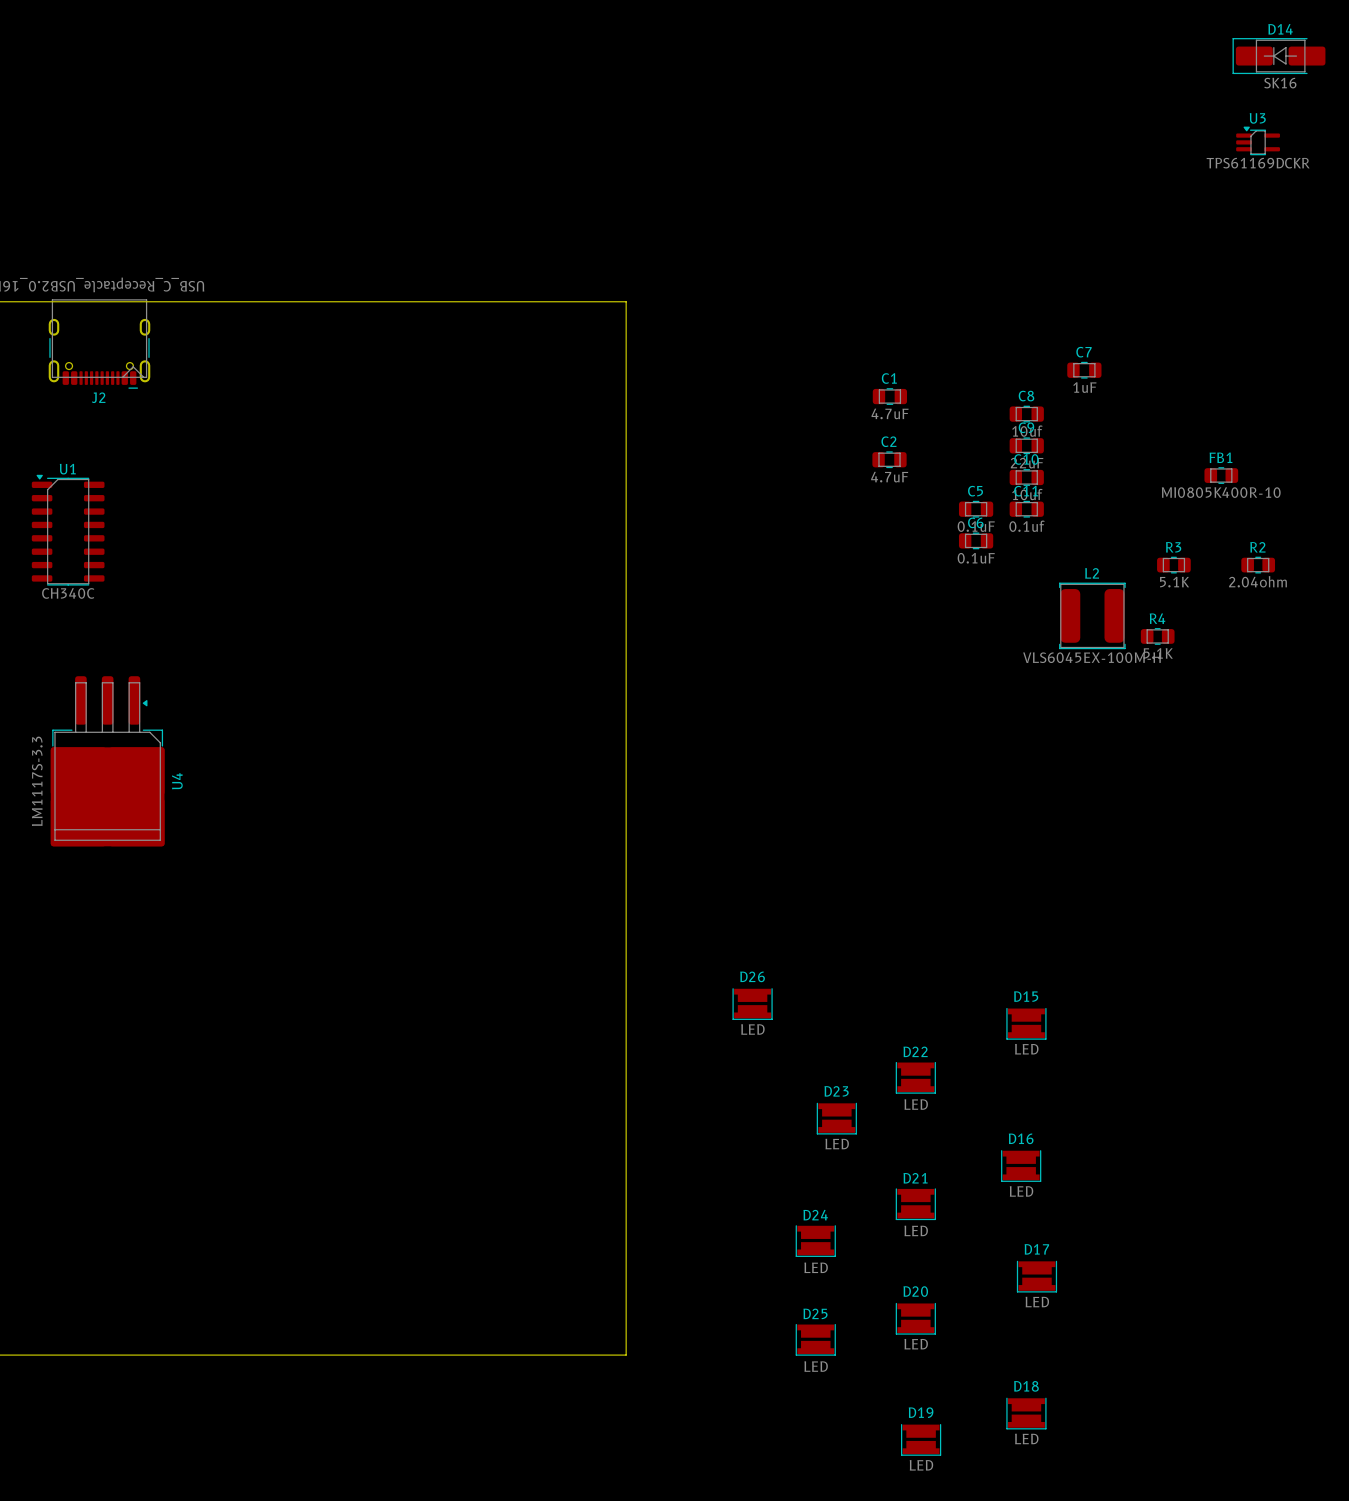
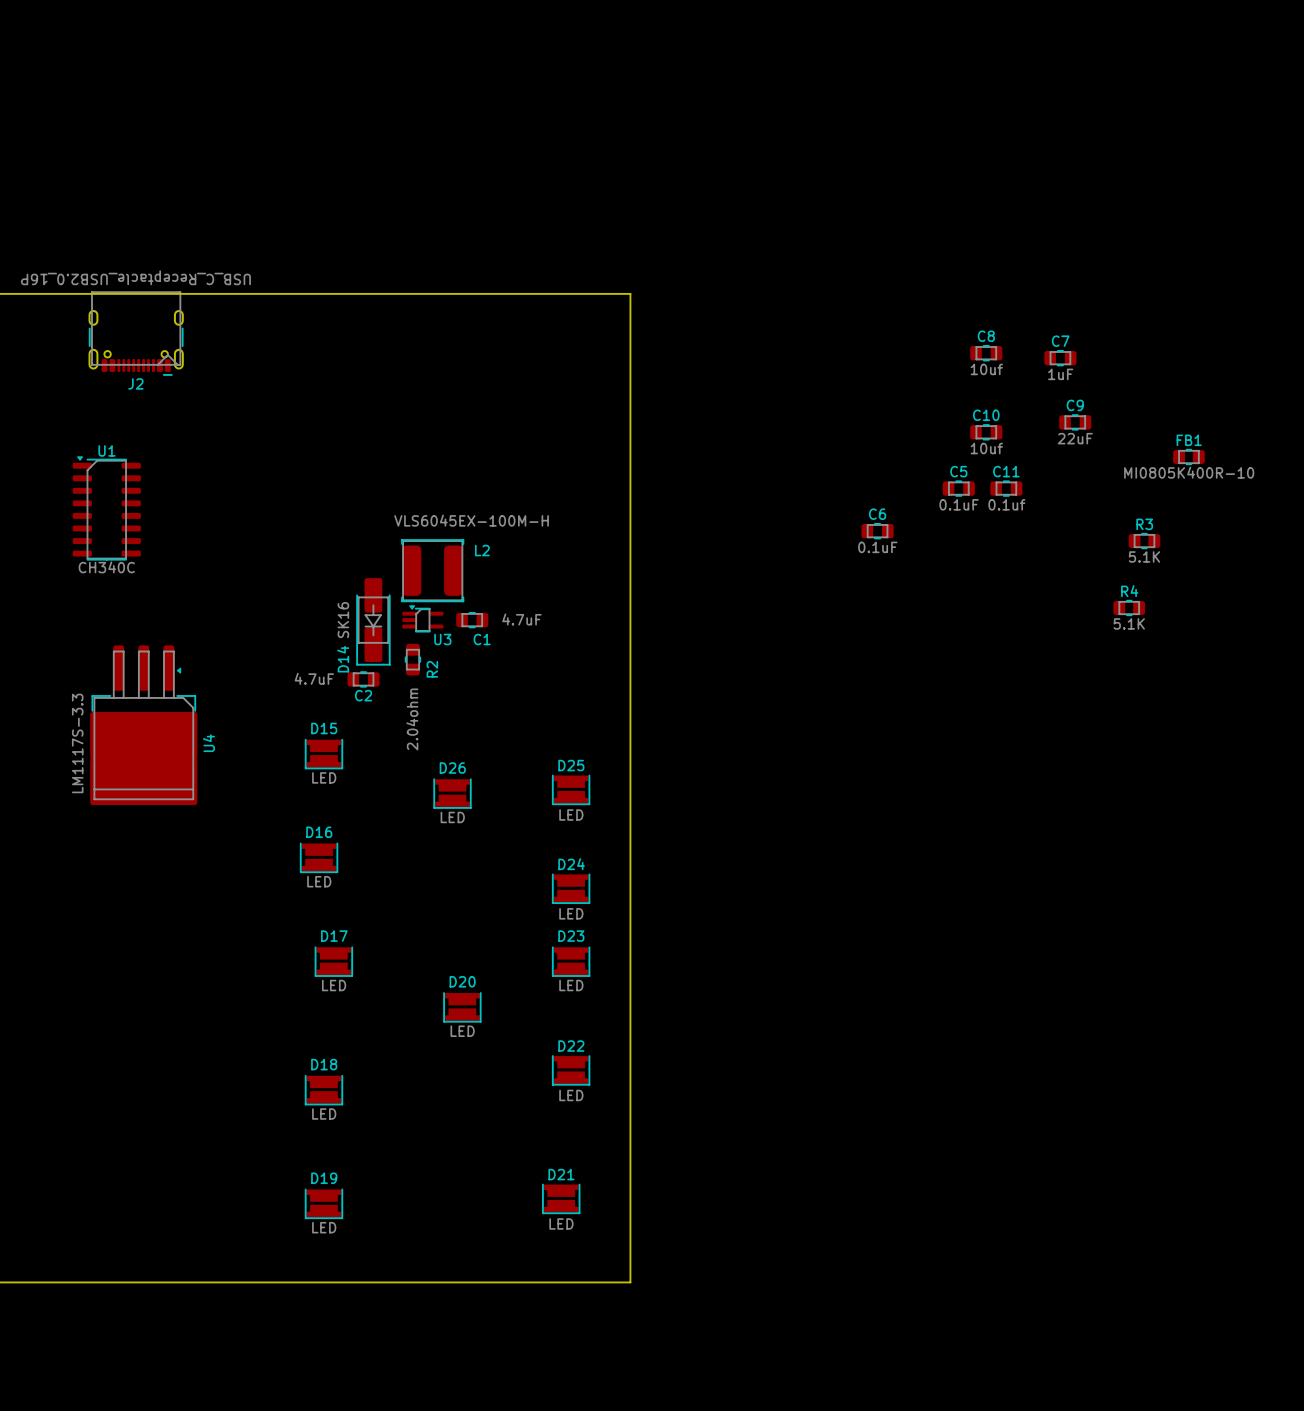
D14 name position: D14 (1280, 29) -> D14 (343, 659)
D14 rotation: 0° (1278, 56) -> 90° counterclockwise (373, 621)
D14 position: (1278, 56) -> (373, 621)
D14 value position: SK16 (1280, 83) -> SK16 (343, 620)
U3 name position: U3 (1257, 118) -> U3 (442, 639)
U3 position: (1258, 140) -> (422, 618)
U3 value: TPS61169DCKR (1258, 163) -> none
C1 name position: C1 (889, 378) -> C1 (482, 639)
C1 position: (889, 396) -> (472, 620)
C1 value position: 4.7uF (890, 413) -> 4.7uF (521, 619)
C8 position: (1026, 414) -> (986, 353)
C2 name position: C2 (888, 441) -> C2 (363, 695)
C9 position: (1026, 445) -> (1075, 422)
C2 position: (889, 459) -> (363, 679)
C2 value position: 4.7uF (889, 477) -> 4.7uF (314, 678)
C10 position: (1026, 477) -> (986, 432)
C6 position: (976, 540) -> (877, 531)
R2 rotation: 0° (1258, 565) -> 90° clockwise (412, 659)
R2 position: (1258, 565) -> (412, 659)
L2 name position: L2 (1092, 573) -> L2 (482, 550)
R2 value position: 2.04ohm (1257, 581) -> 2.04ohm (412, 719)
L2 position: (1092, 615) -> (432, 570)
L2 value position: VLS6045EX-100M-H (1091, 657) -> VLS6045EX-100M-H (471, 520)
D26 position: (752, 1004) -> (452, 793)
D15 position: (1026, 1023) -> (323, 754)
D22 position: (915, 1077) -> (571, 1070)
D23 position: (836, 1118) -> (571, 961)
D16 position: (1021, 1166) -> (319, 857)
D21 position: (915, 1204) -> (561, 1198)
D24 position: (815, 1241) -> (571, 888)
D17 position: (1036, 1276) -> (333, 961)
D20 position: (915, 1318) -> (462, 1007)
D25 position: (815, 1339) -> (571, 789)
D18 position: (1026, 1413) -> (323, 1090)
D19 position: (921, 1439) -> (323, 1203)

